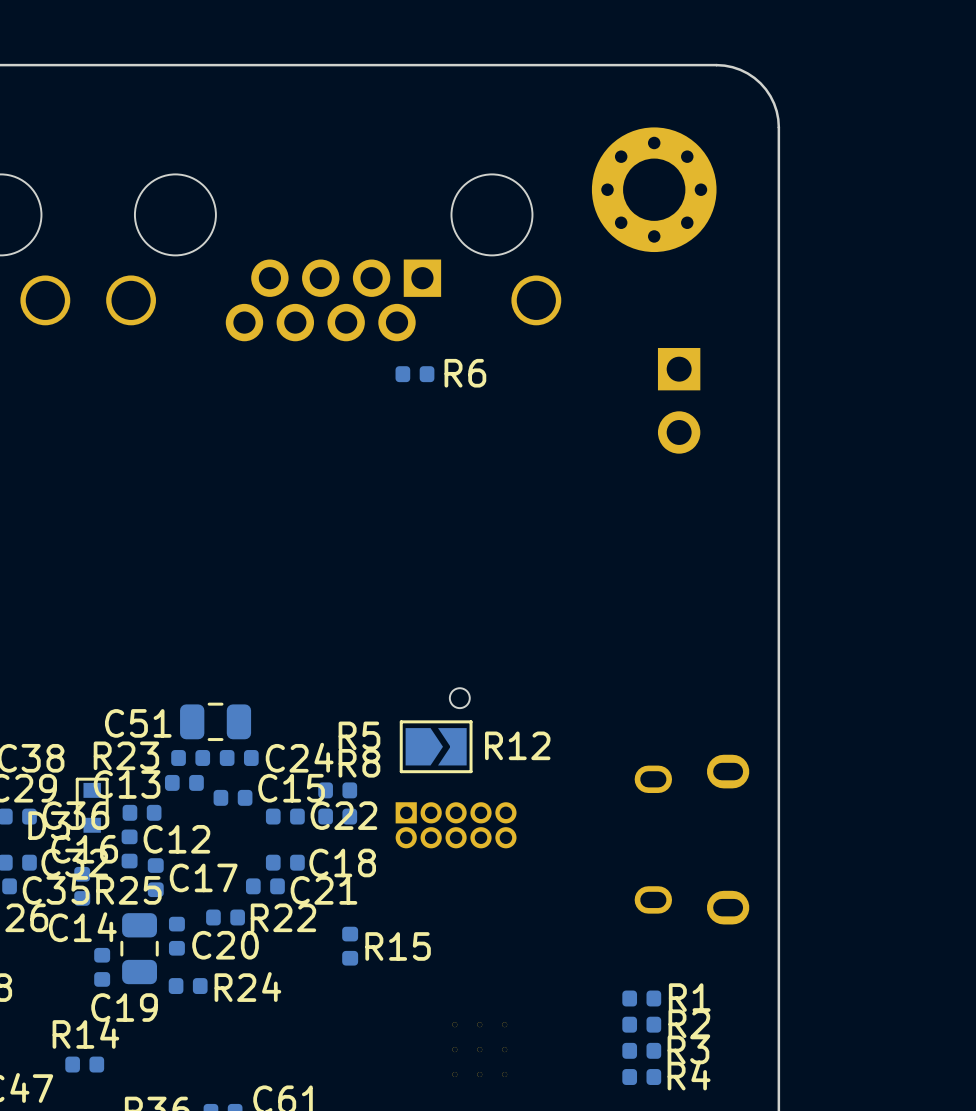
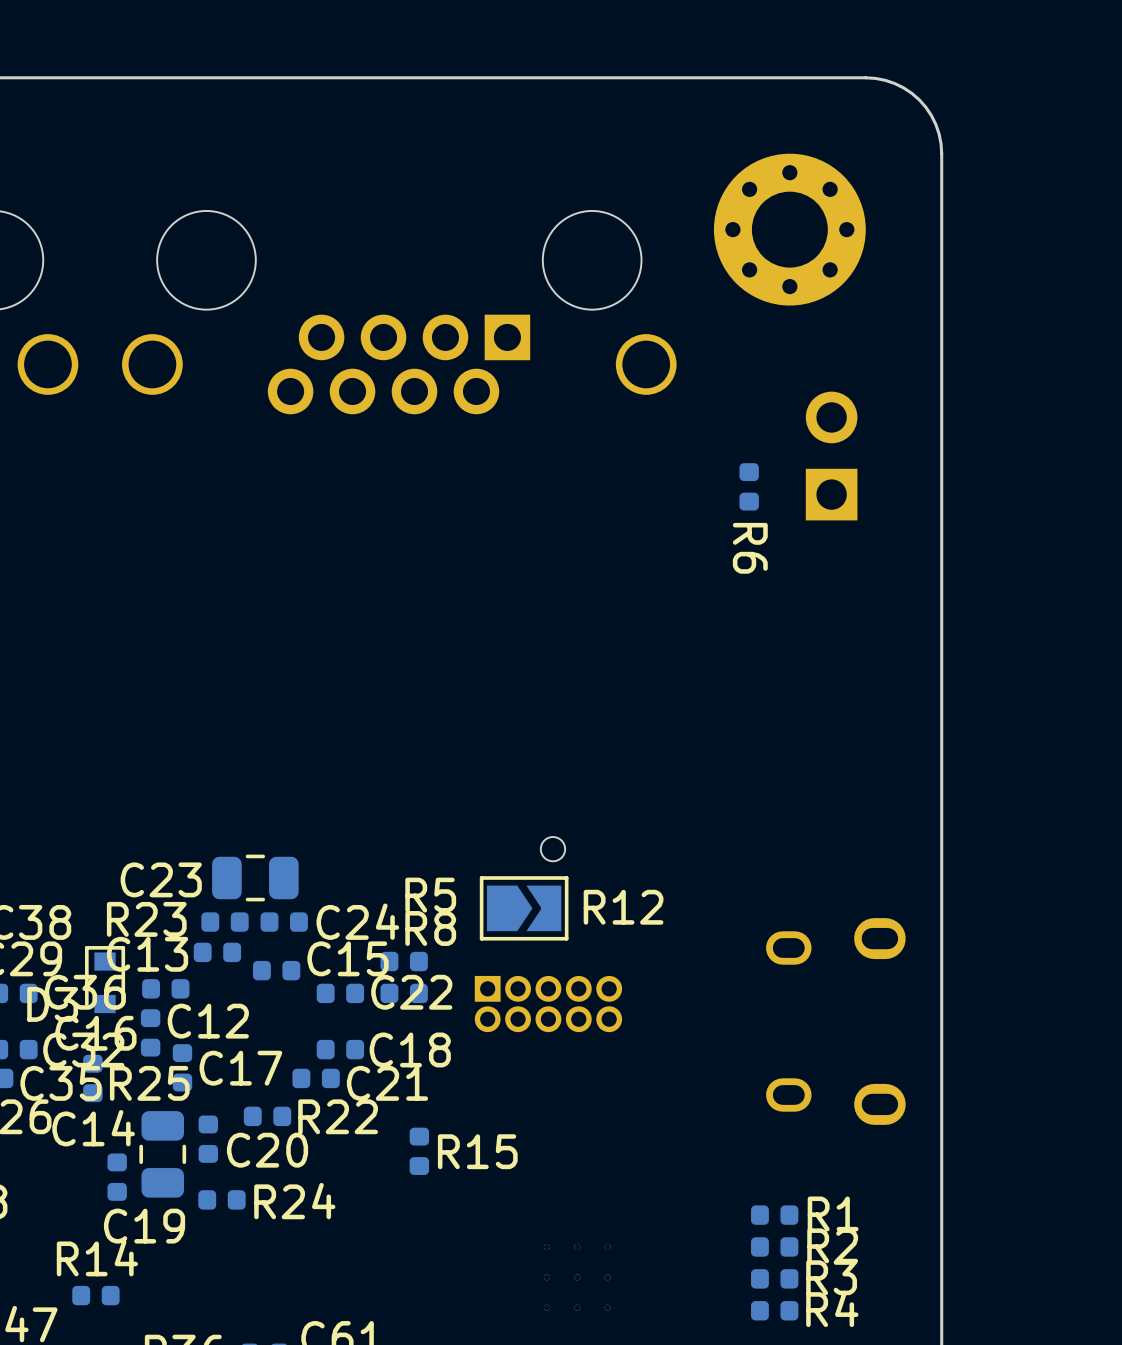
R6 rotation: 0° (414, 374) -> 90° clockwise (749, 486)
R6 position: (414, 374) -> (749, 486)
part rotation: 0° (679, 400) -> 180° (831, 456)
C51 name: C51 (138, 723) -> C23 (161, 879)

